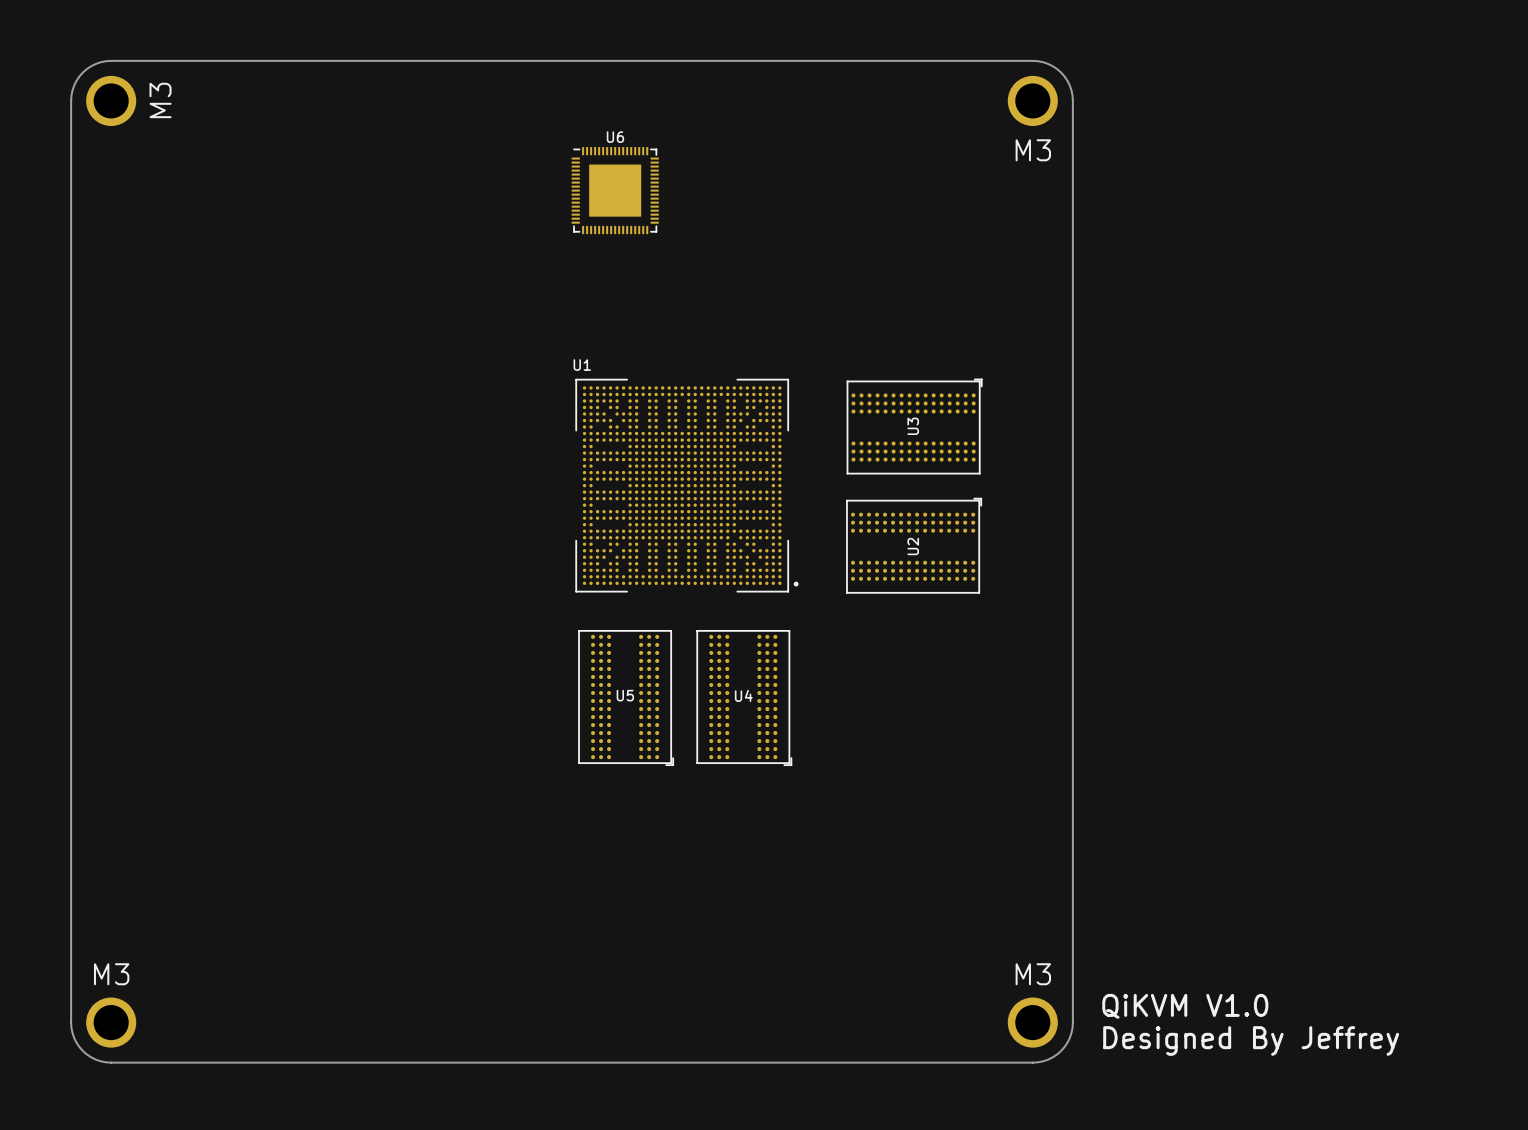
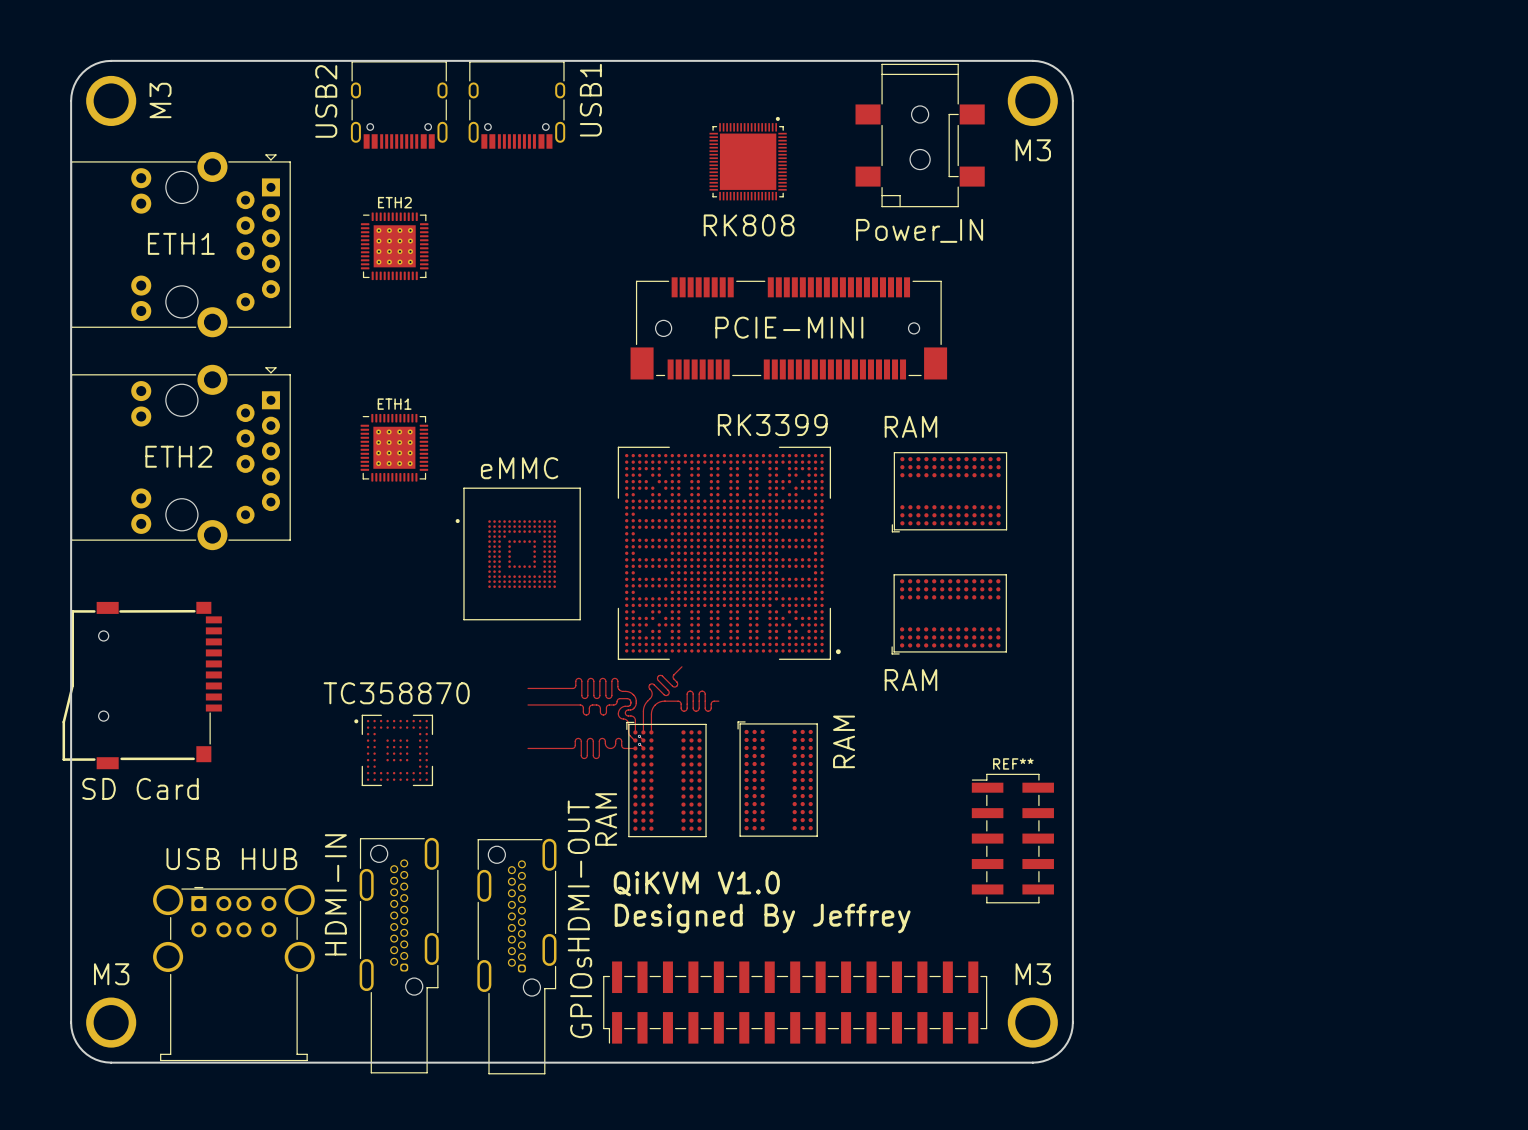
USB2: none -> (399, 105)
USB1: none -> (516, 105)
Power_IN: none -> (920, 135)
RK808: none -> (748, 158)
U6: (615, 190) -> none
ETH1: none -> (180, 244)
ETH2: none -> (394, 246)
PCIE-MINI: none -> (788, 328)
U3: (914, 426) -> none
ETH1: none -> (394, 447)
ETH2: none -> (180, 457)
U1: (687, 485) -> none
RAM: none -> (949, 492)
U2: (914, 545) -> none
eMMC: none -> (518, 553)
RK3399: none -> (729, 553)
RAM: none -> (949, 614)
track: none -> (681, 666) (673, 675) (677, 683) (675, 686) (672, 686) (661, 675) (657, 677) (658, 680) (668, 691) (667, 695) (664, 694) (653, 684) (649, 685) (652, 694) (643, 708) (643, 732)
SD Card: none -> (142, 685)
track: none -> (528, 688) (573, 688) (575, 686) (576, 679) (579, 678) (581, 681) (581, 696) (585, 698) (587, 695) (587, 680) (591, 678) (593, 681) (593, 696) (597, 698) (599, 695) (599, 680) (603, 678) (605, 681) (605, 696) (609, 698) (611, 695) (612, 680) (616, 678) (619, 689) (630, 692) (635, 697) (635, 706) (625, 712) (626, 715) (634, 718) (635, 732)
U5: (626, 698) -> none
U4: (744, 698) -> none
track: none -> (718, 701) (712, 701) (710, 709) (706, 710) (705, 693) (701, 691) (699, 693) (699, 708) (695, 710) (693, 708) (693, 693) (690, 691) (687, 693) (687, 708) (685, 710) (681, 709) (679, 701) (659, 702) (651, 710) (651, 732)
track: none -> (528, 704) (580, 705) (583, 706) (583, 713) (586, 715) (589, 713) (590, 705) (597, 705) (603, 715) (606, 713) (607, 705) (615, 704) (619, 698) (628, 698) (630, 701) (630, 705) (620, 708) (618, 714) (620, 717) (627, 721) (628, 734) (635, 740)
track: none -> (639, 736) (643, 740)
via: none -> (639, 736)
track: none -> (639, 744) (643, 748)
via: none -> (639, 744)
track: none -> (528, 748) (573, 748) (575, 739) (578, 738) (581, 740) (581, 755) (583, 758) (587, 756) (587, 741) (589, 738) (593, 740) (593, 755) (595, 758) (599, 756) (599, 741) (601, 738) (604, 739) (605, 745) (608, 748) (614, 746) (616, 739) (618, 738) (621, 740) (623, 748) (635, 748)
TC358870: none -> (393, 750)
RAM: none -> (666, 779)
RAM: none -> (777, 779)
REF**: none -> (1012, 838)
text: none -> QiKVM V1.0 (696, 883)
text: none -> Designed By Jeffrey (762, 918)
HDMI-IN: none -> (399, 955)
HDMI-OUT: none -> (516, 956)
USB HUB: none -> (233, 973)
GPIOs: none -> (795, 1002)
text: QiKVM V1.0 (1185, 1006) -> none
text: Designed By Jeffrey (1251, 1041) -> none

